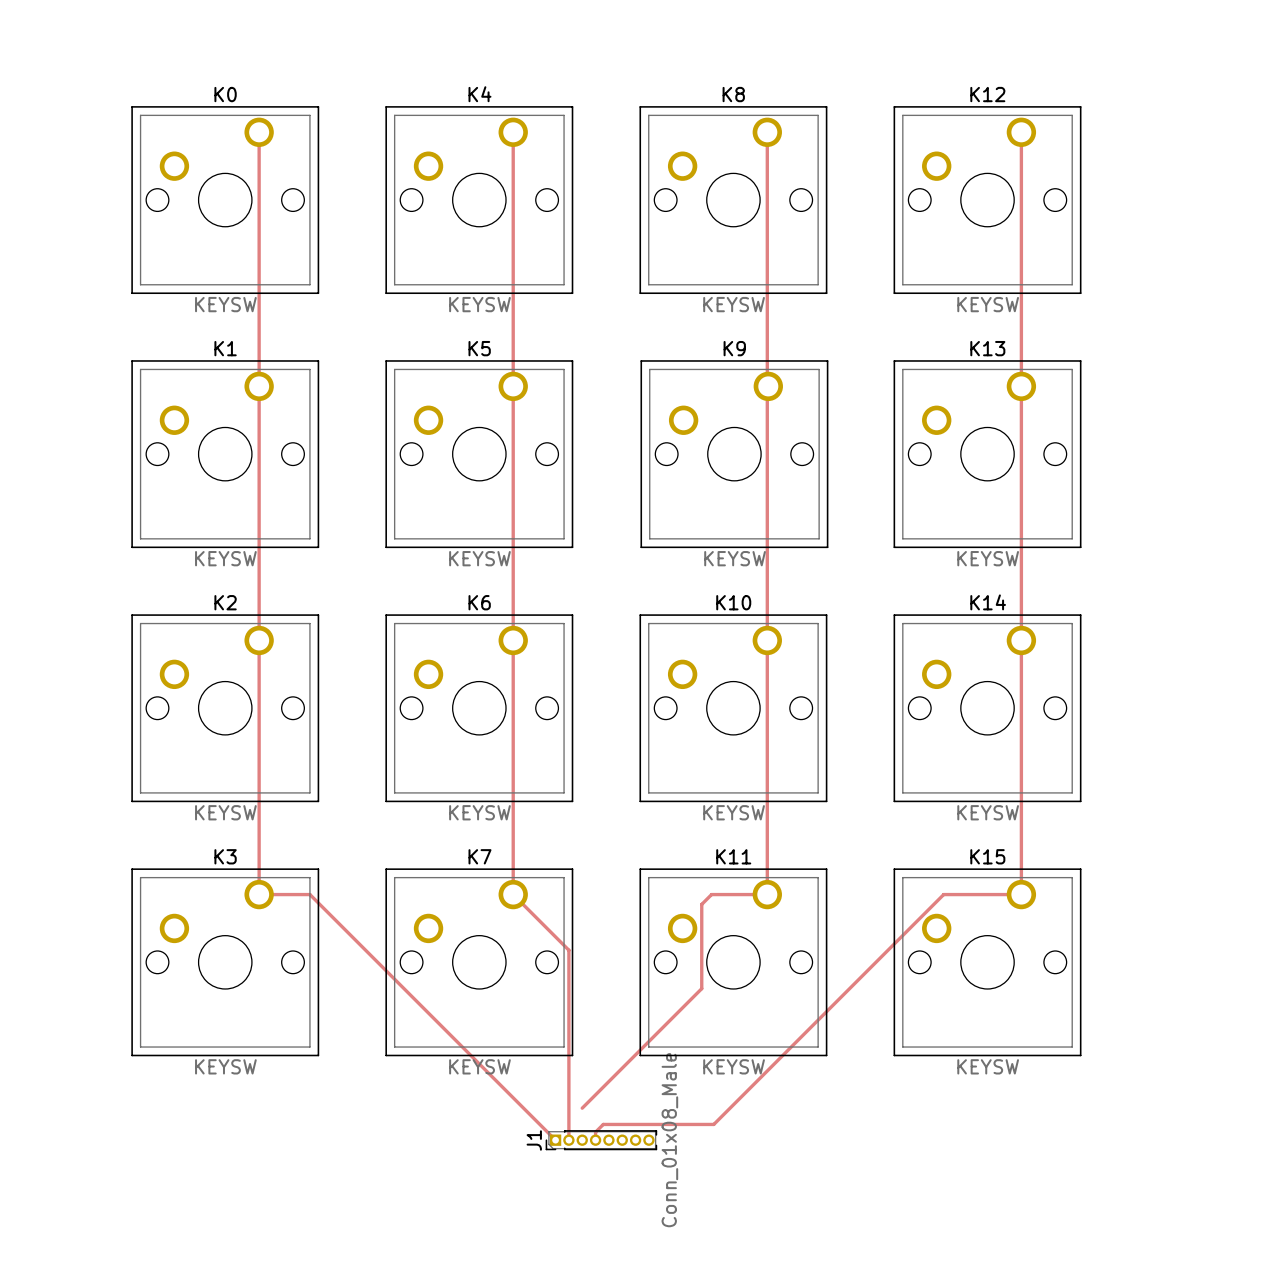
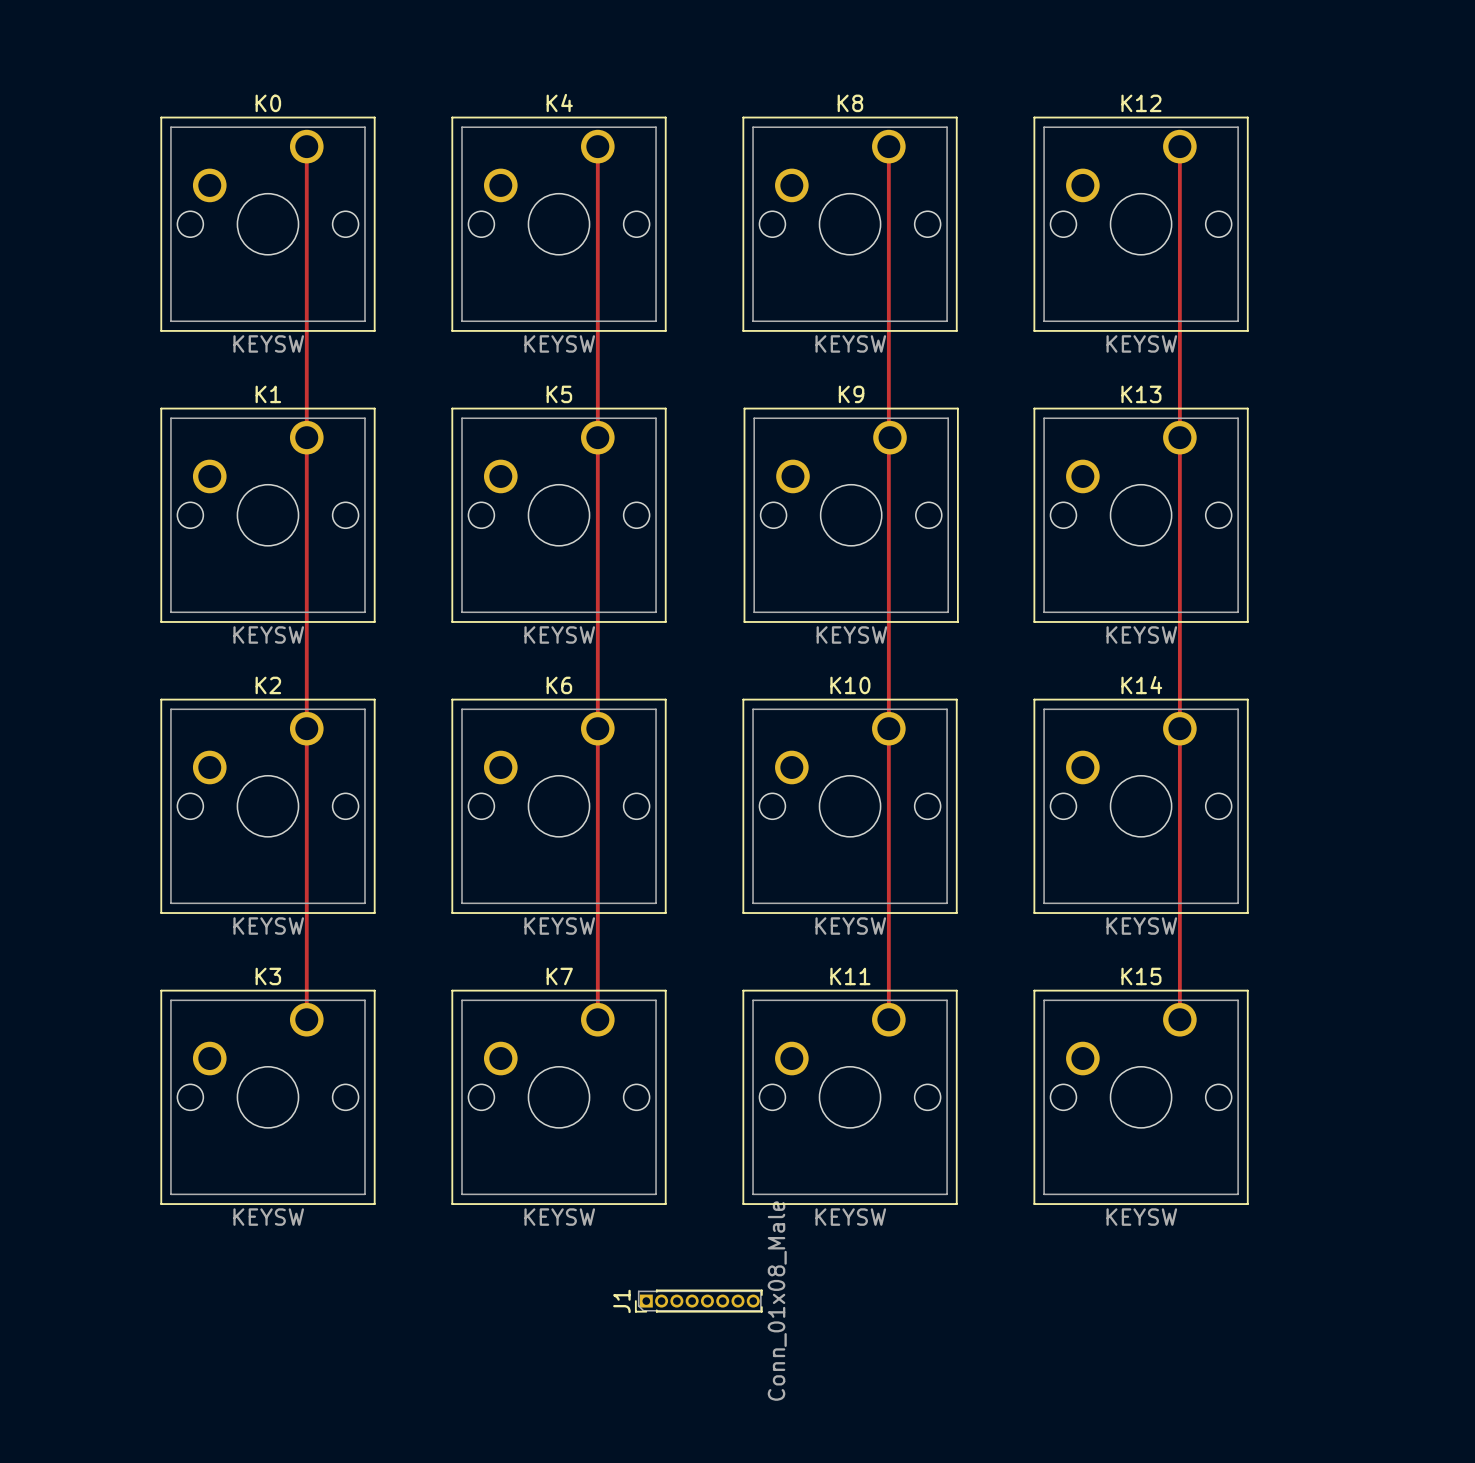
track: (259, 894) (309, 894) (555, 1140) -> none
track: (513, 894) (568, 950) (568, 1140) -> none
track: (767, 894) (711, 894) (701, 904) (701, 988) (582, 1108) -> none
track: (1021, 894) (943, 894) (713, 1124) (603, 1124) (595, 1132) (595, 1140) -> none

